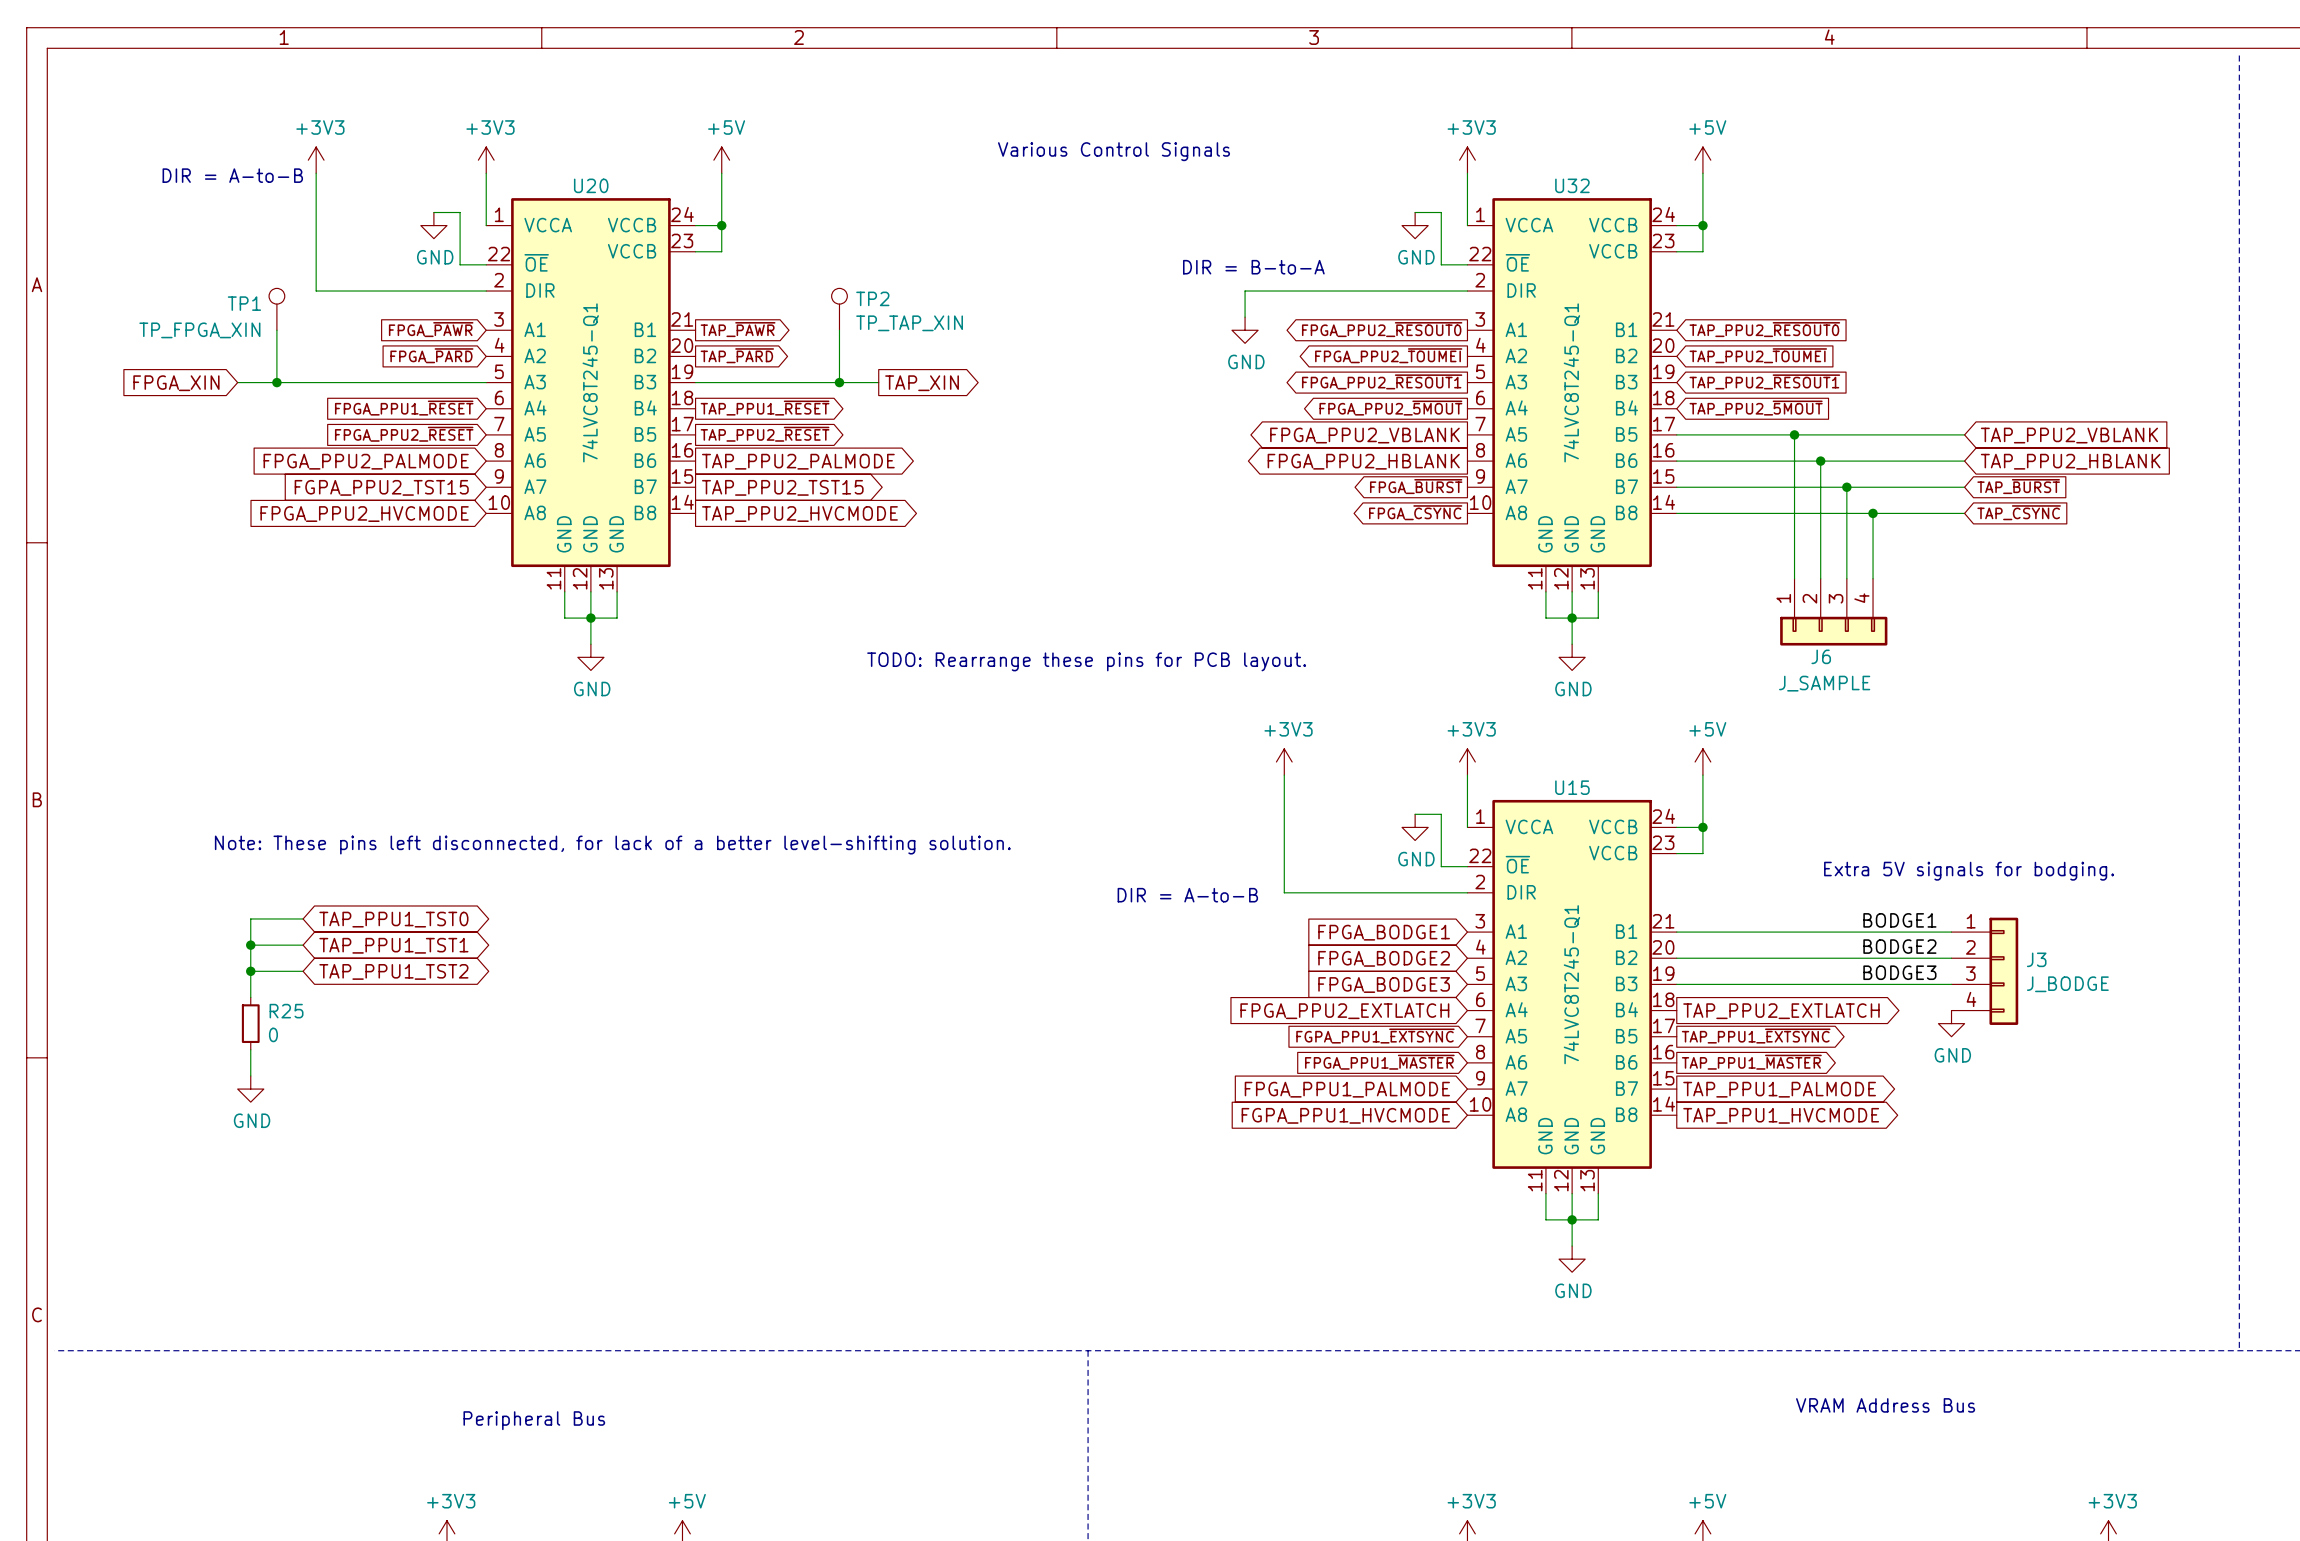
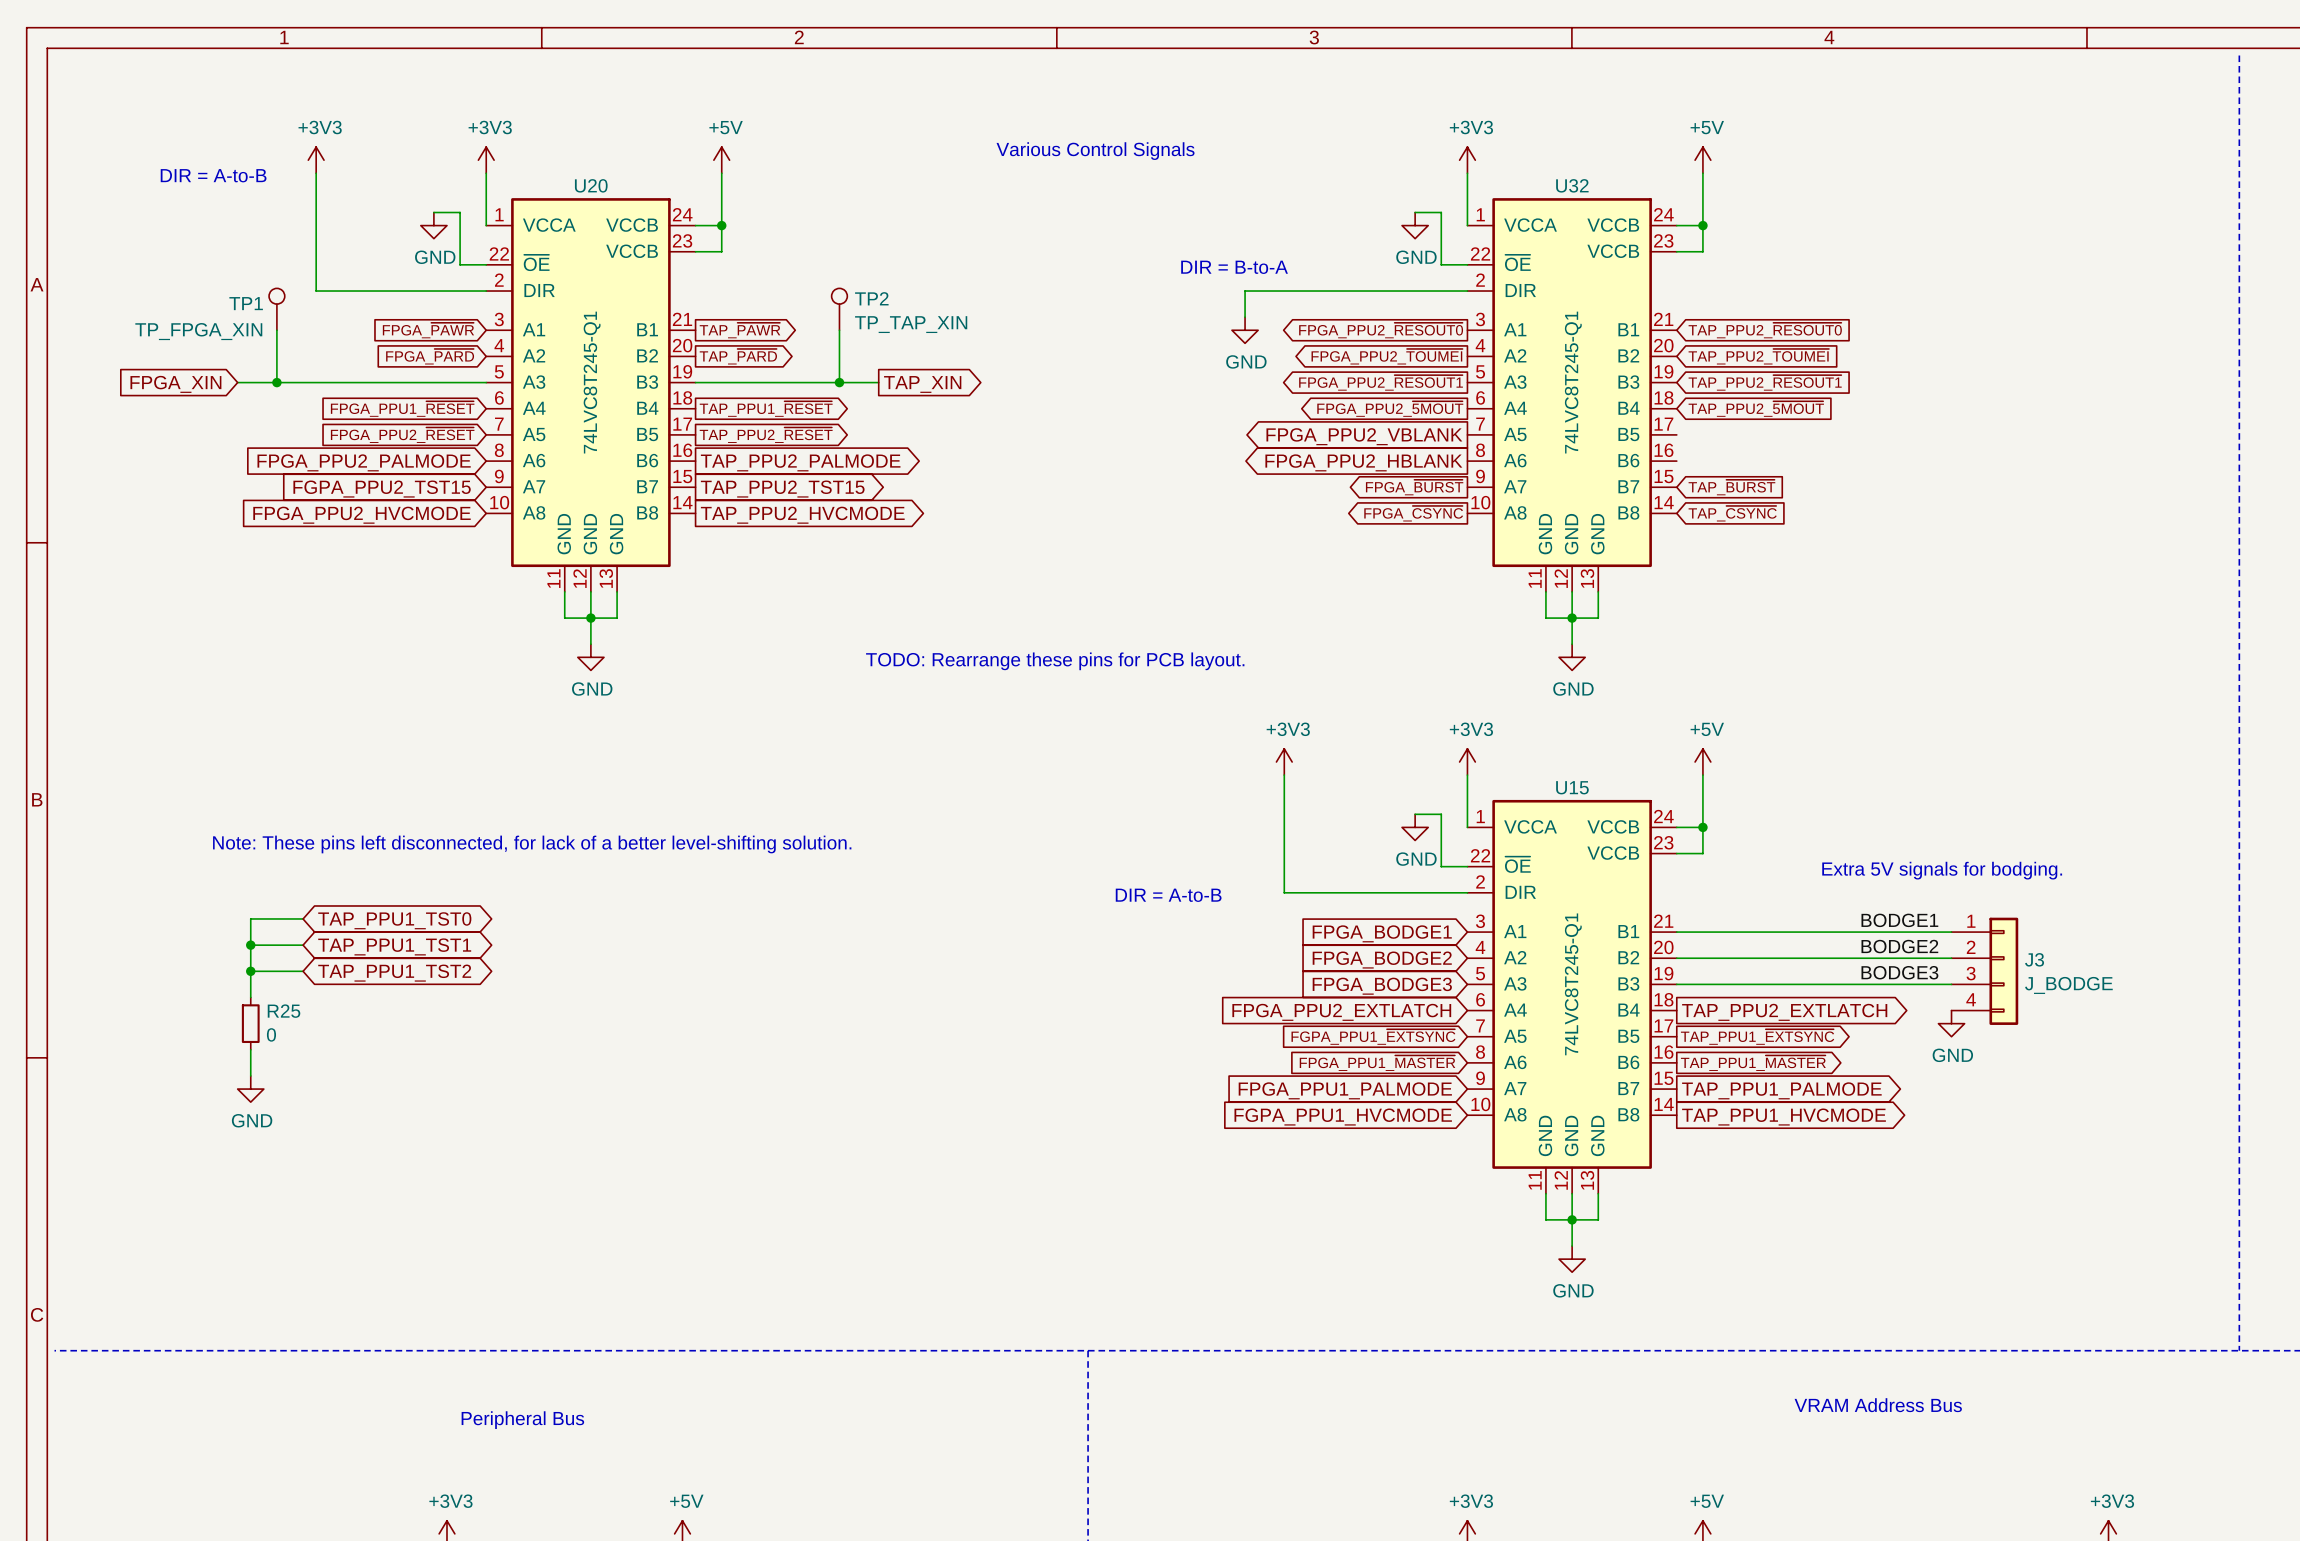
wire: (1676, 434) (1964, 434) -> none
wire: (1794, 434) (1794, 578) -> none
junction: (1794, 434) -> none
global label: TAP_PPU2_VBLANK (2069, 435) -> none
wire: (1676, 461) (1964, 461) -> none
wire: (1820, 461) (1820, 578) -> none
junction: (1820, 461) -> none
global label: TAP_PPU2_HBLANK (2070, 461) -> none
global label: none -> TAP_~{BURST} (1731, 487)
global label: TAP_~{BURST} (2018, 486) -> none
wire: (1676, 487) (1964, 487) -> none
wire: (1846, 487) (1846, 578) -> none
junction: (1846, 487) -> none
global label: none -> TAP_~{CSYNC} (1732, 513)
global label: TAP_~{CSYNC} (2019, 512) -> none
wire: (1676, 513) (1964, 513) -> none
wire: (1873, 513) (1873, 578) -> none
junction: (1873, 513) -> none
J6: J_SAMPLE (1833, 612) -> none

